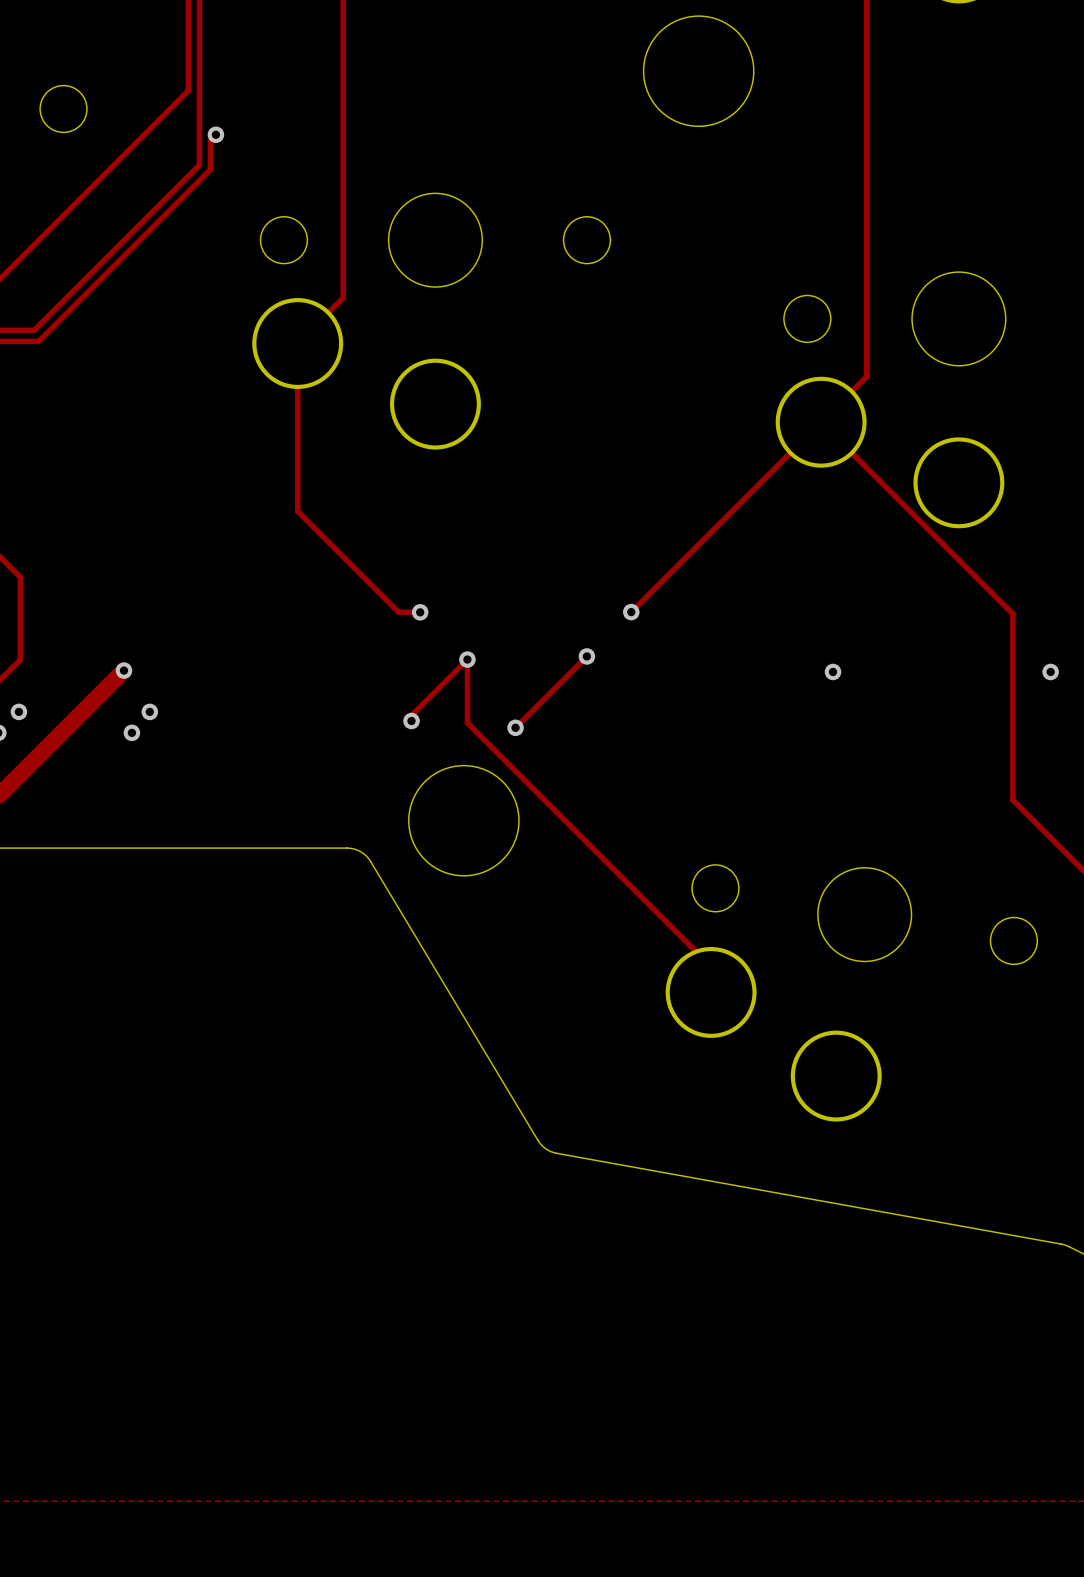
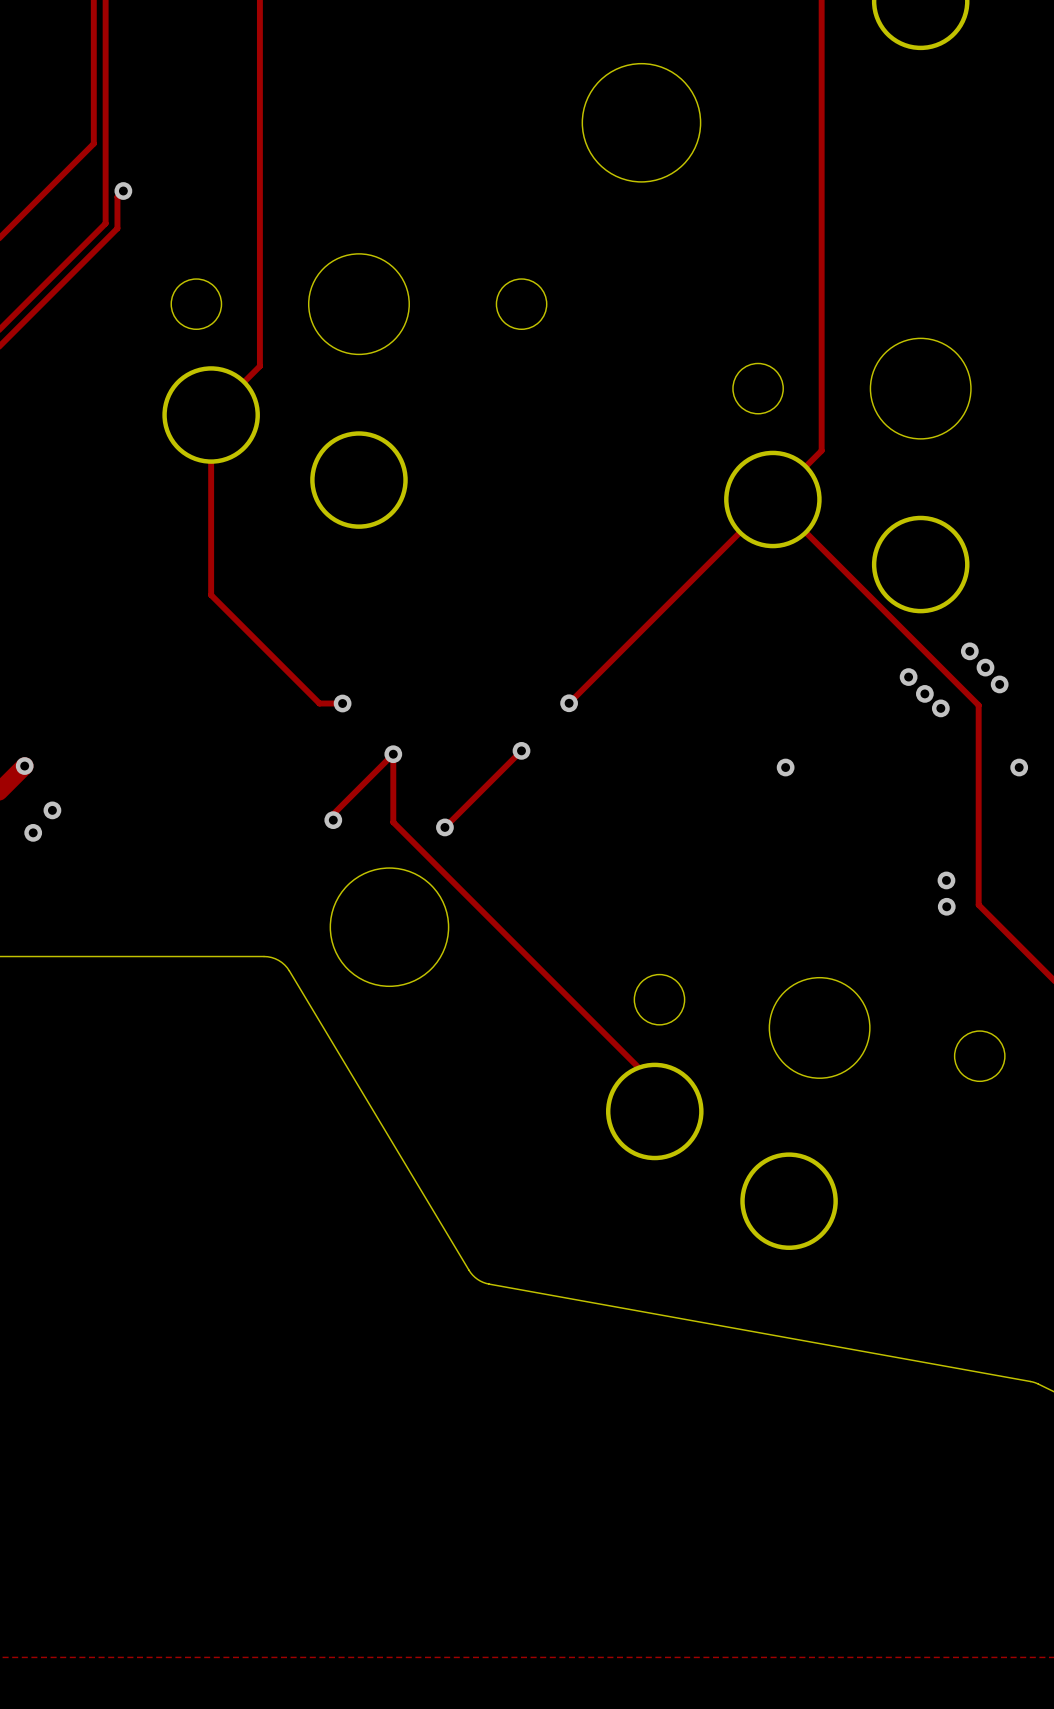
via: none -> (969, 651)
via: none -> (985, 667)
via: none -> (908, 677)
via: none -> (999, 684)
via: none -> (924, 693)
via: none -> (940, 708)
via: none -> (946, 880)
via: none -> (946, 906)

